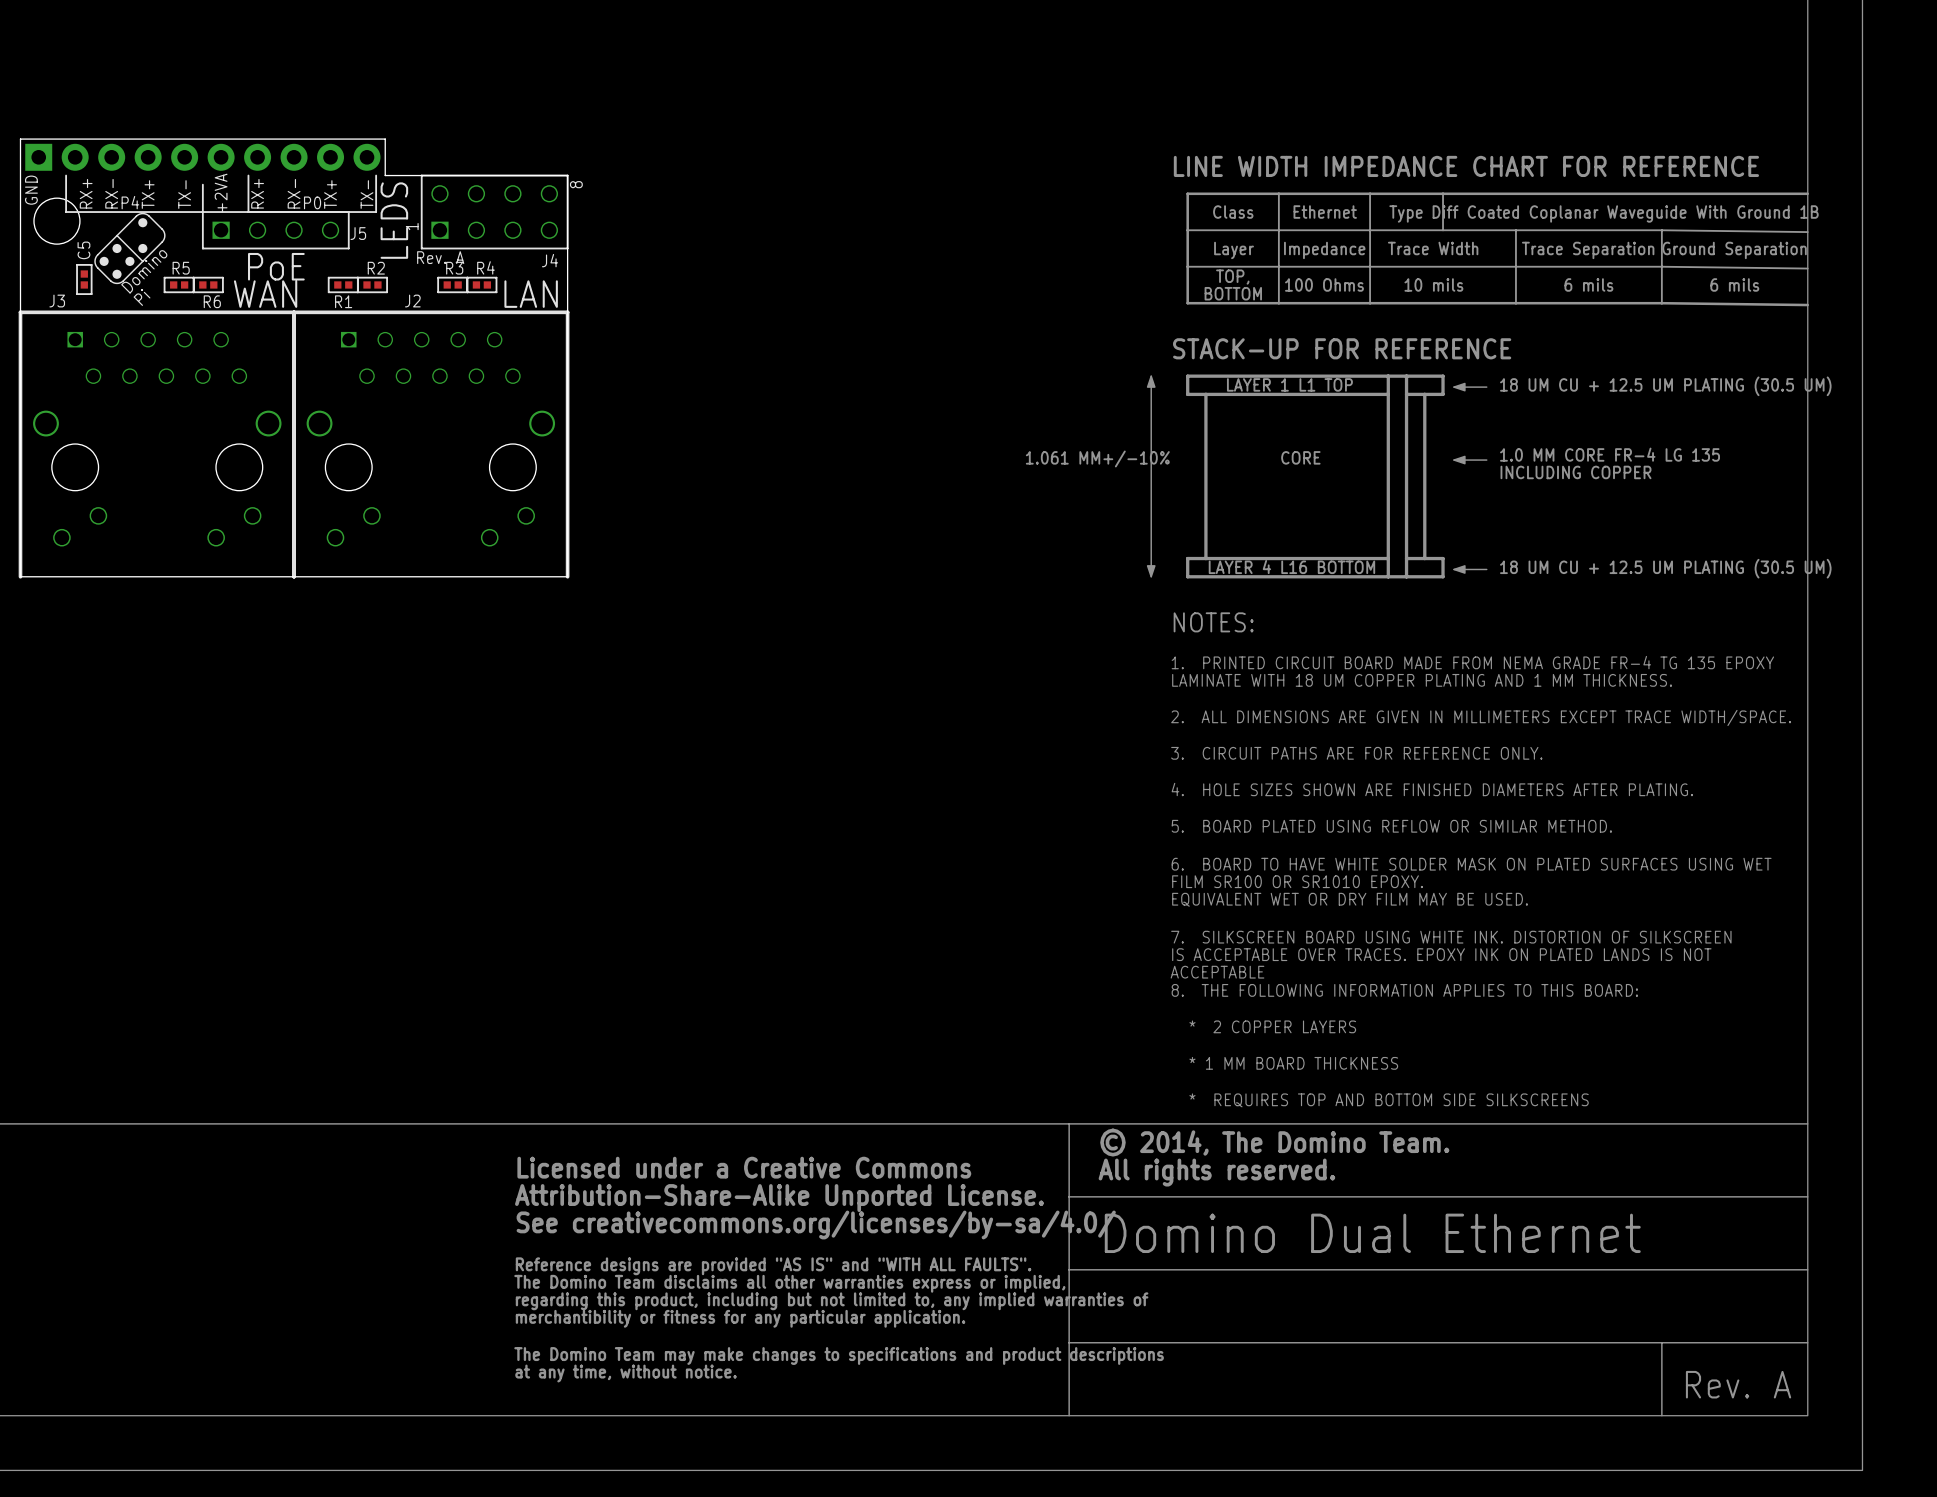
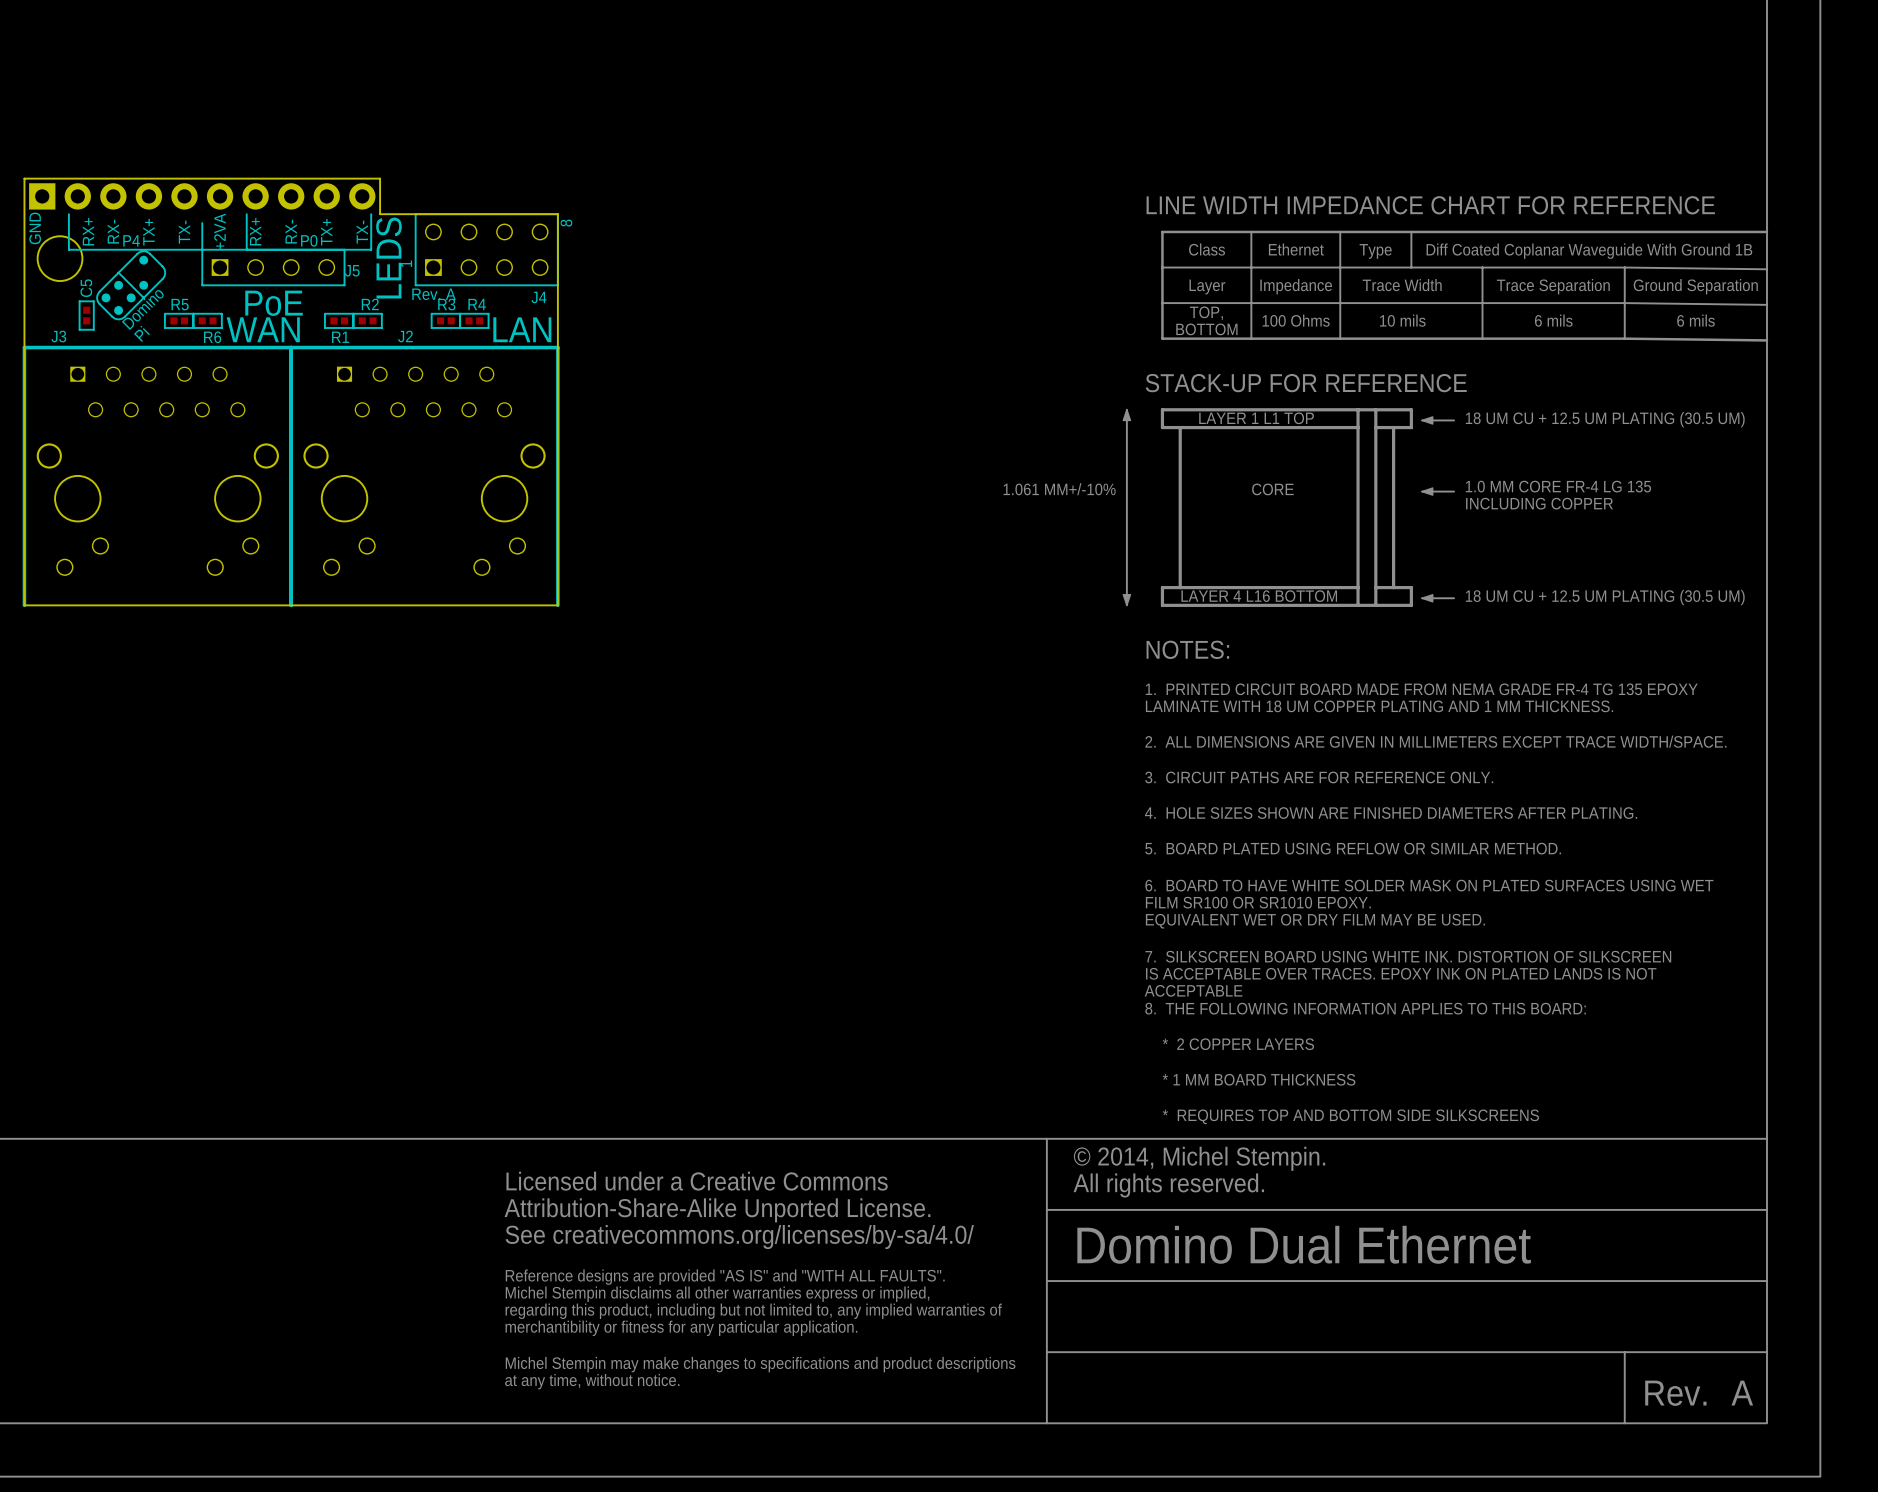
text: © 2014, The Domino Team. (1274, 1142) -> © 2014, Michel Stempin. (1199, 1158)
text: The Domino Team disclaims all other warranties express or implied, (789, 1283) -> Michel Stempin disclaims all other warranties express or implied, (717, 1294)
text: The Domino Team may make changes to specifications and product descriptions (839, 1356) -> Michel Stempin may make changes to specifications and product descriptions (760, 1364)

